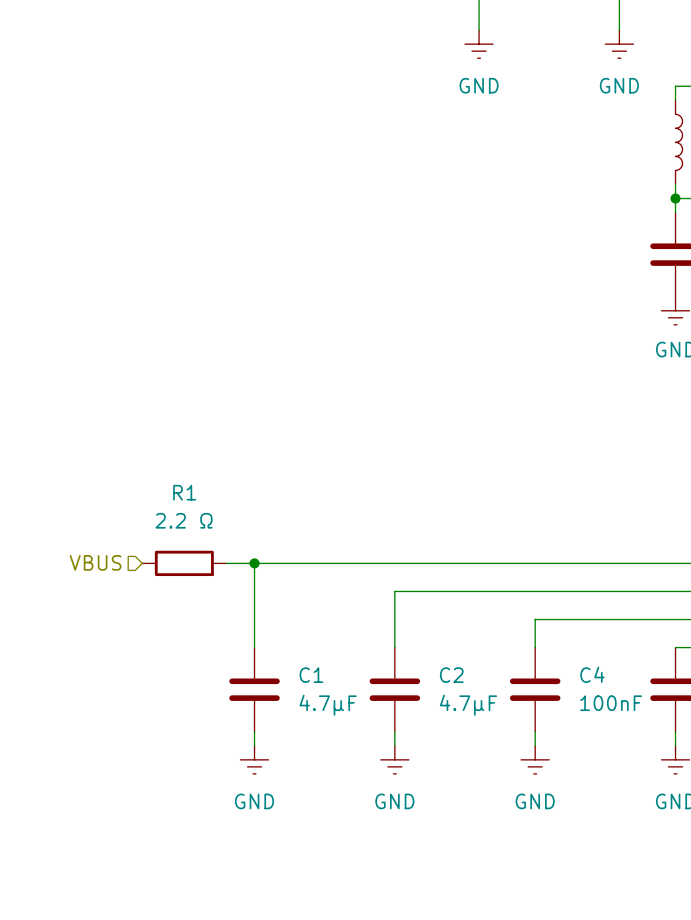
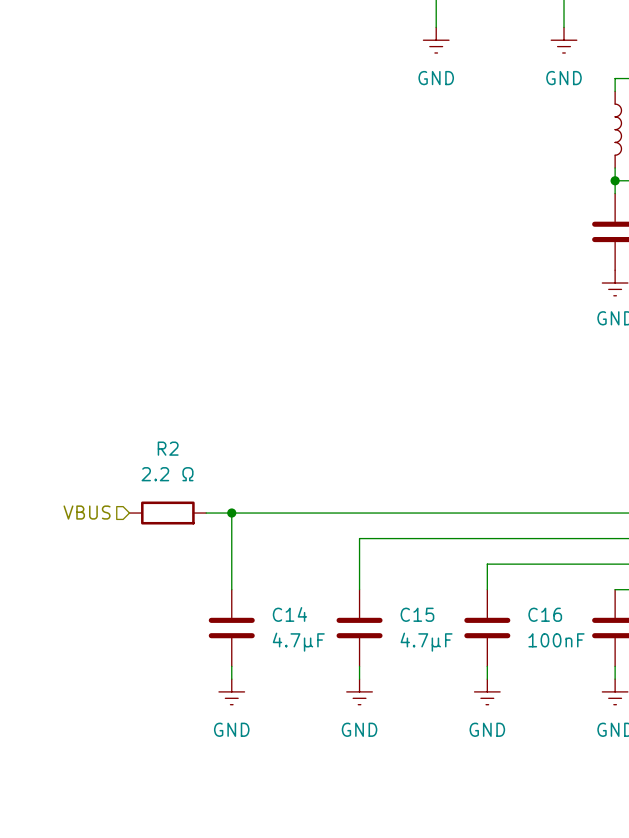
R1 name: R1 (184, 492) -> R2 (168, 448)
C4 name: C4 (592, 674) -> C16 (545, 614)
C1 name: C1 (311, 675) -> C14 (289, 614)
C2 name: C2 (451, 675) -> C15 (417, 614)

